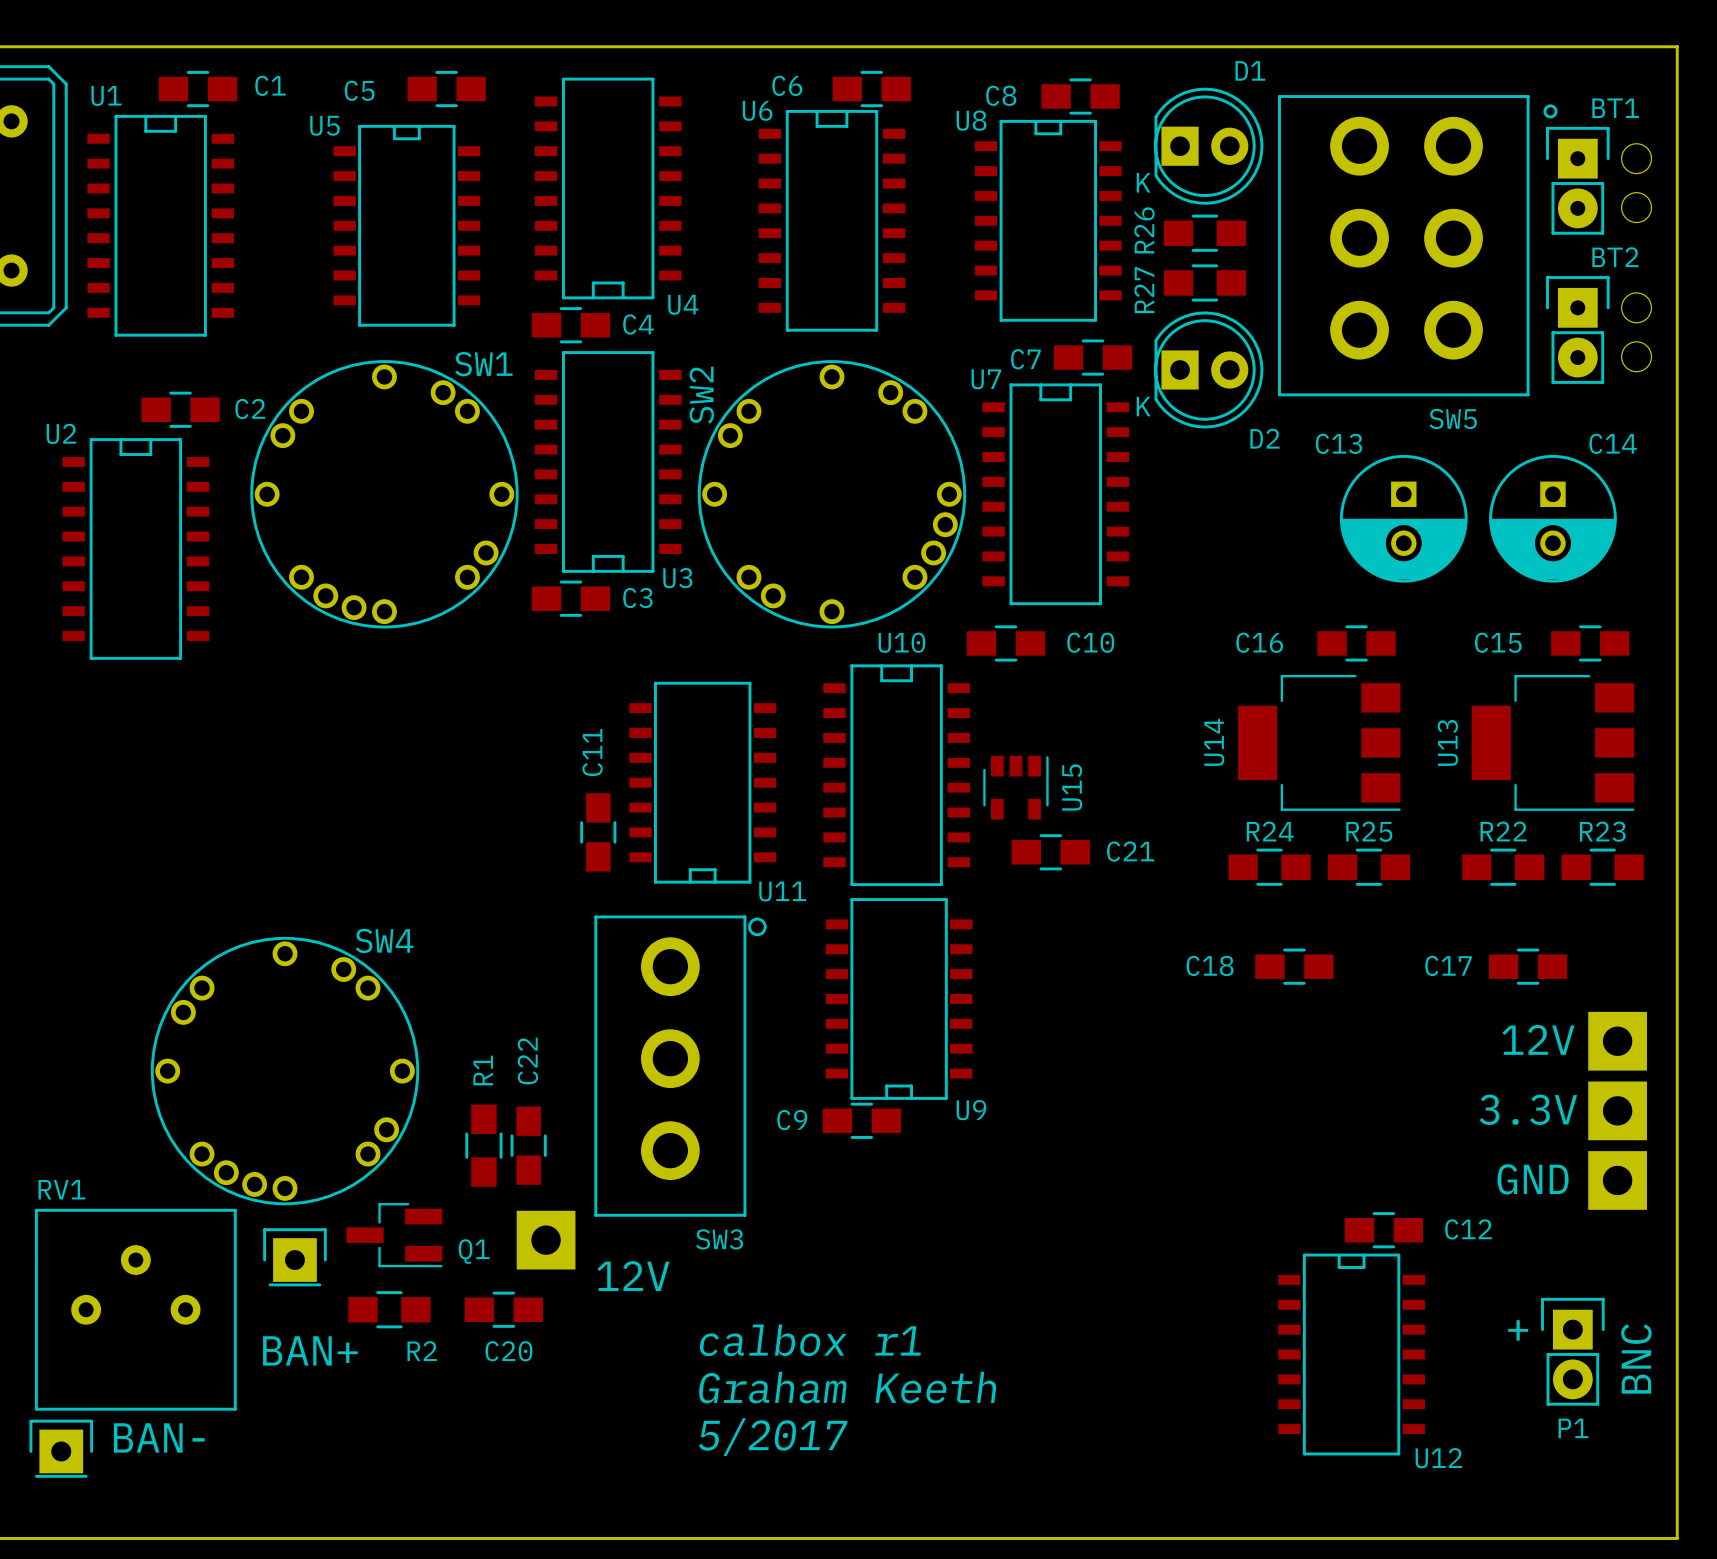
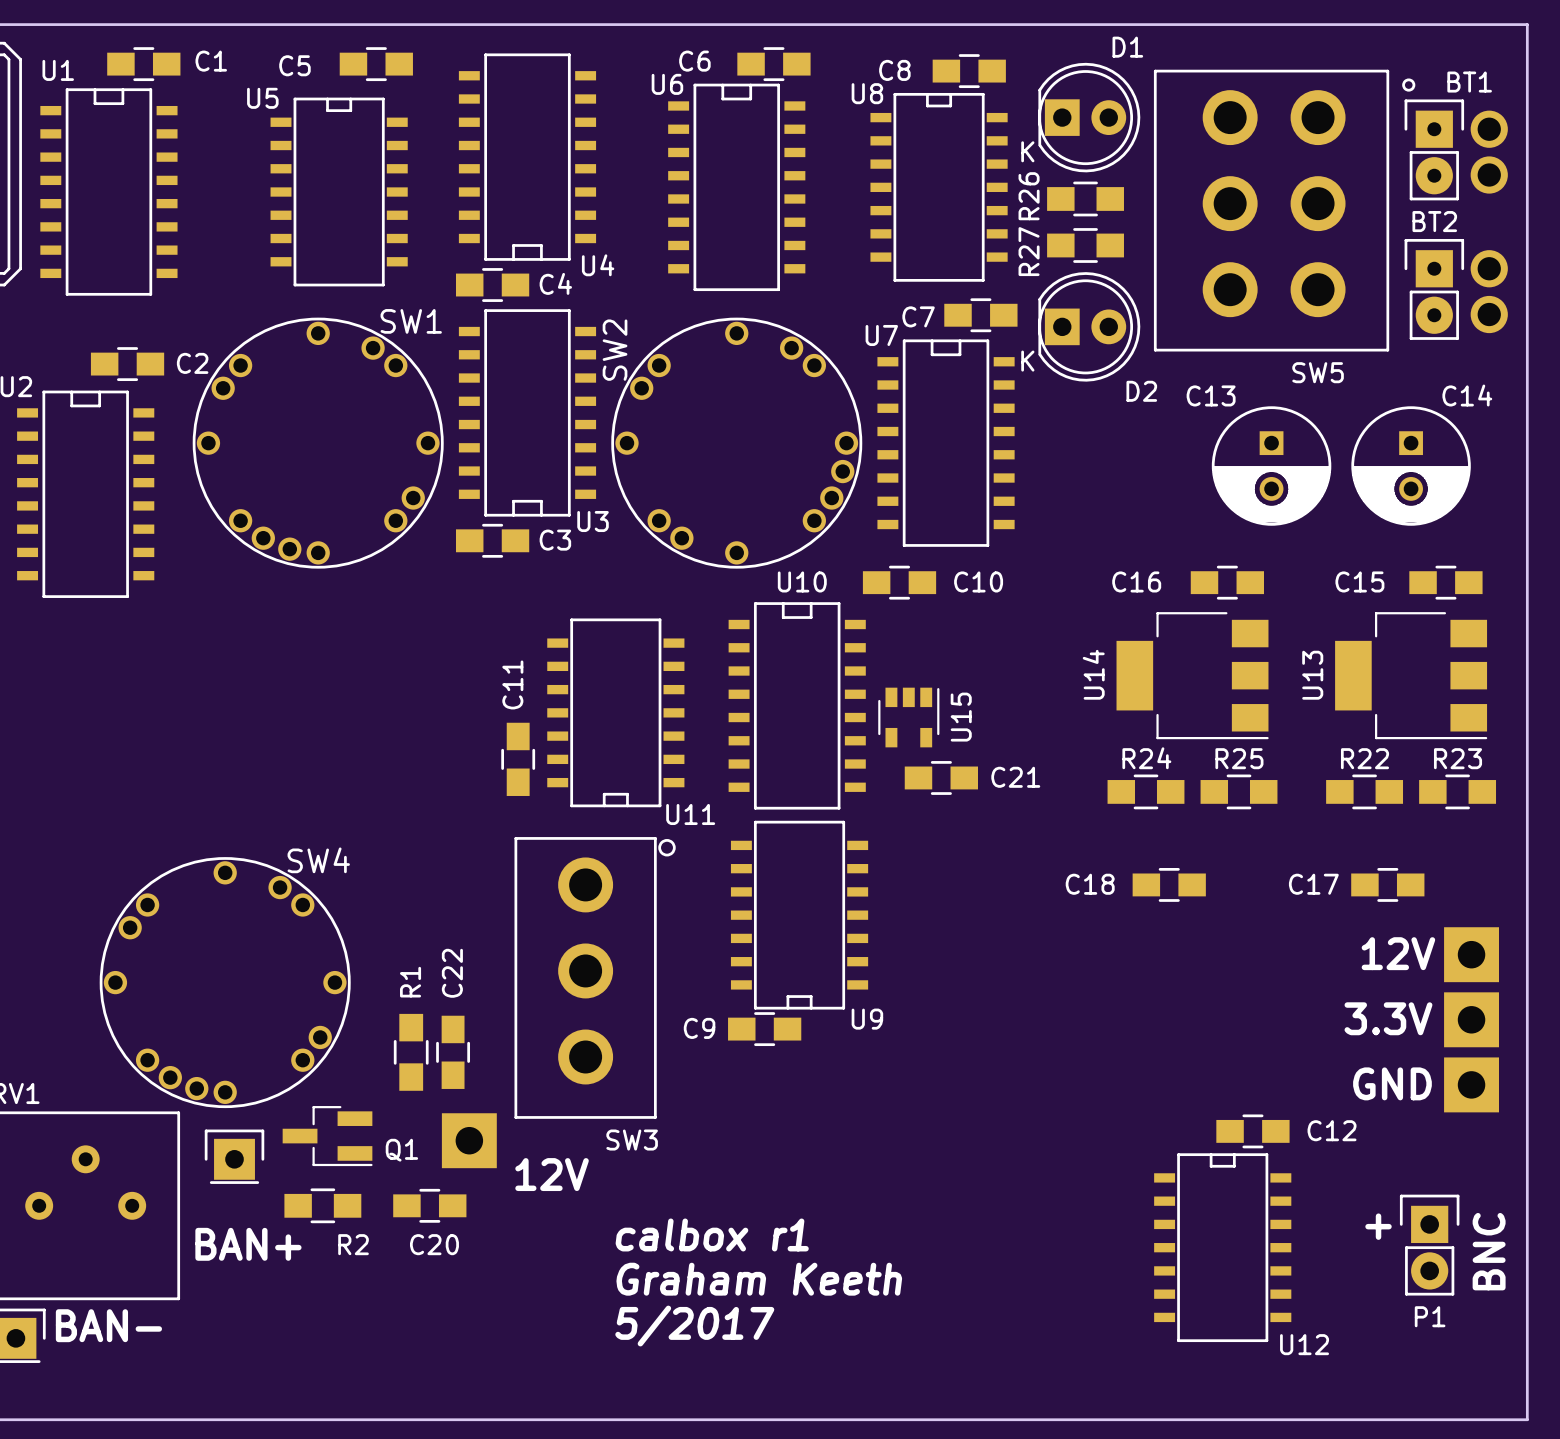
BT1 footprint: [1546, 126, 1652, 235] -> [1404, 99, 1508, 201]
BT2 name position: BT2 (1615, 257) -> BT2 (1434, 221)
BT2 footprint: [1546, 276, 1652, 384] -> [1404, 238, 1508, 340]

